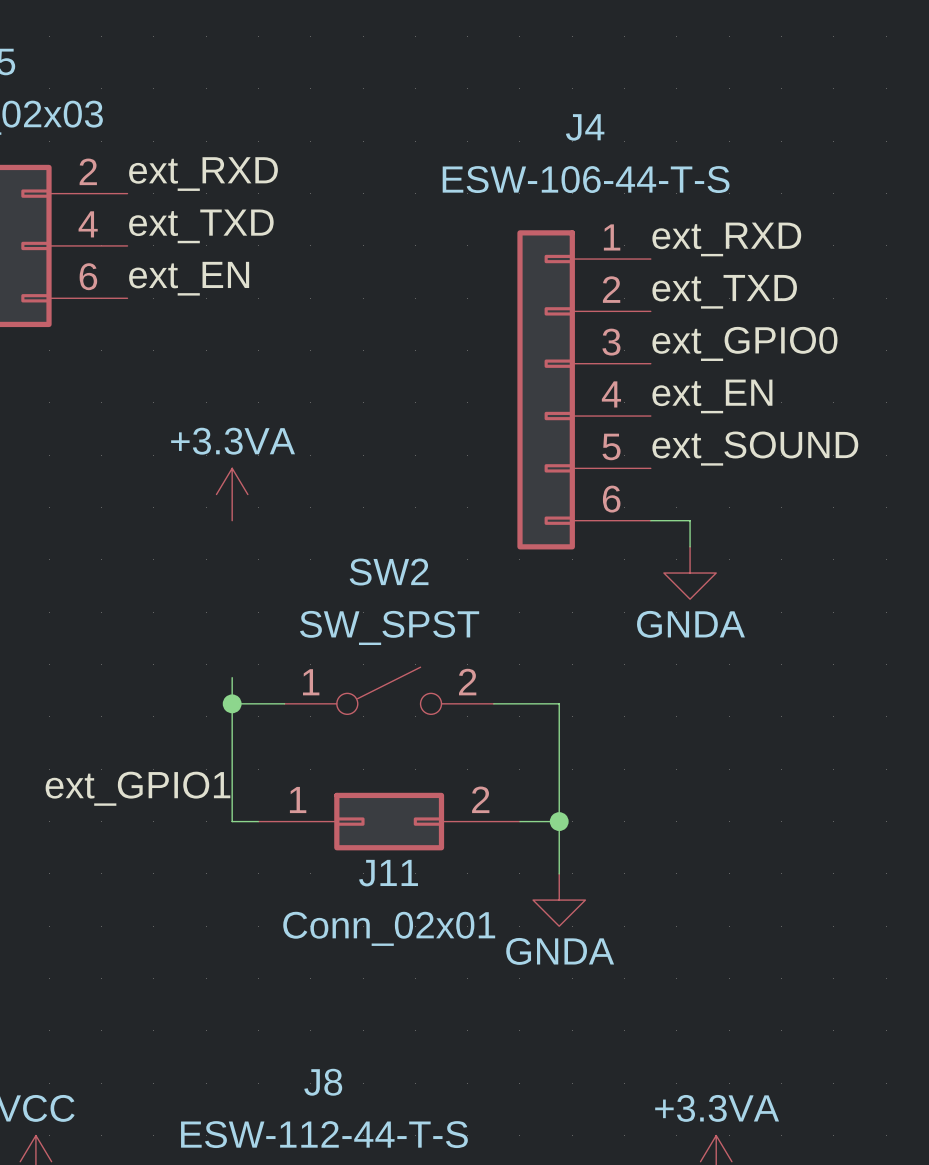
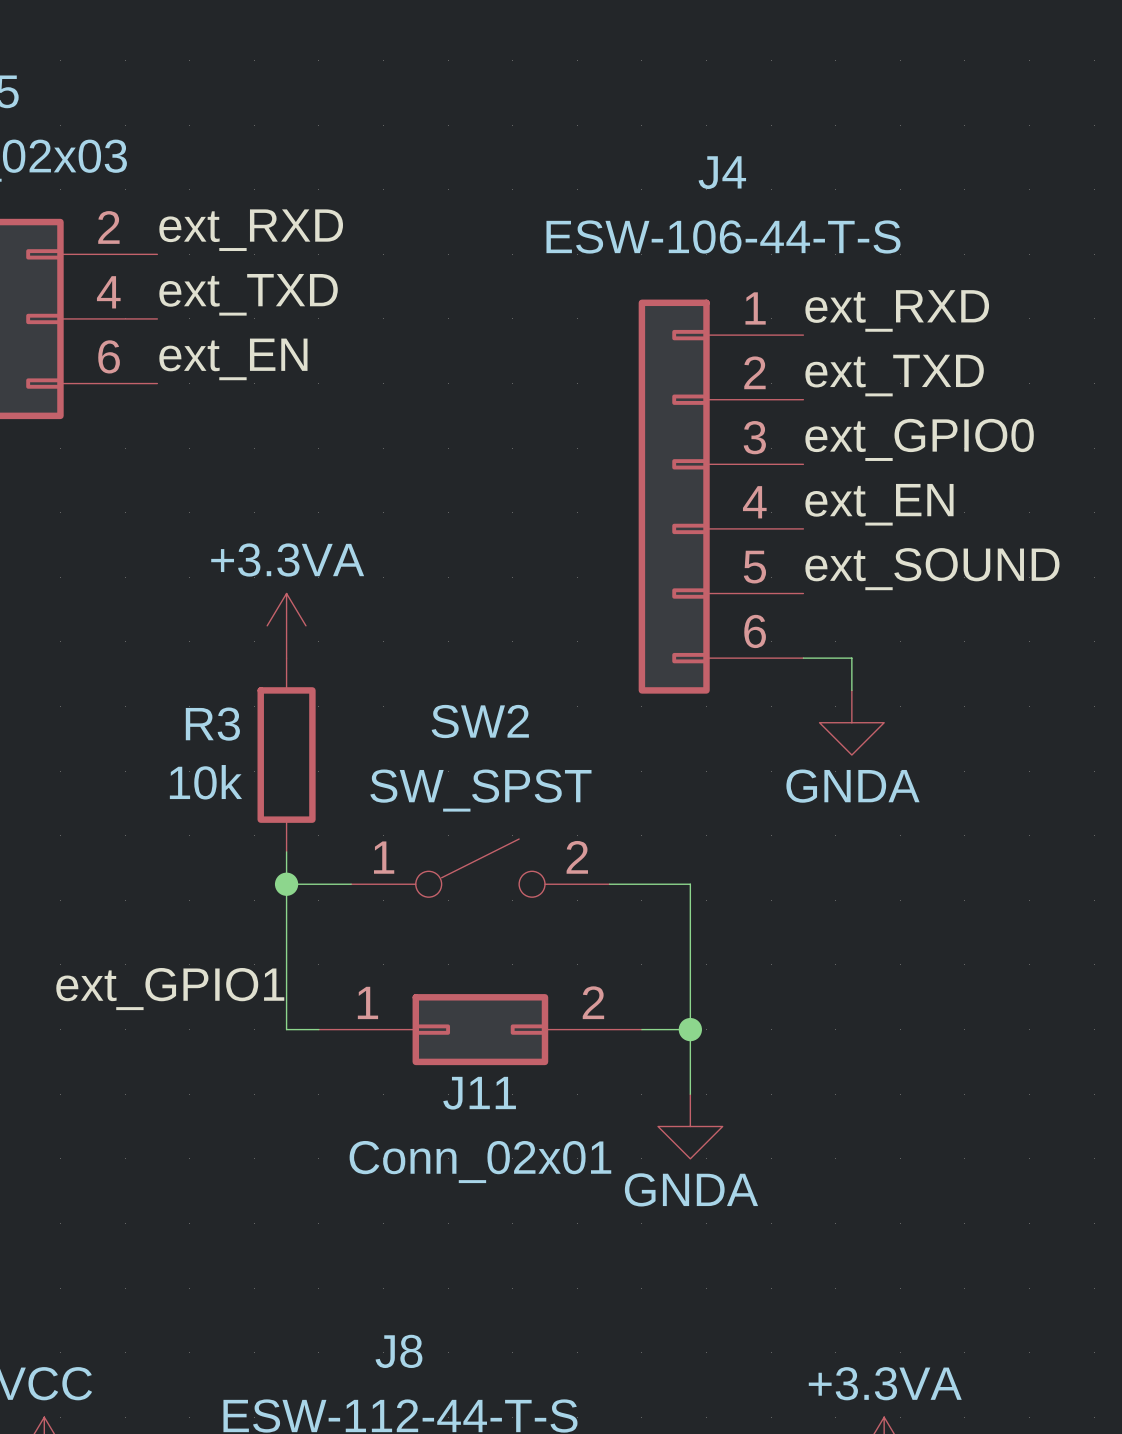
R3: none -> 10k (286, 755)

